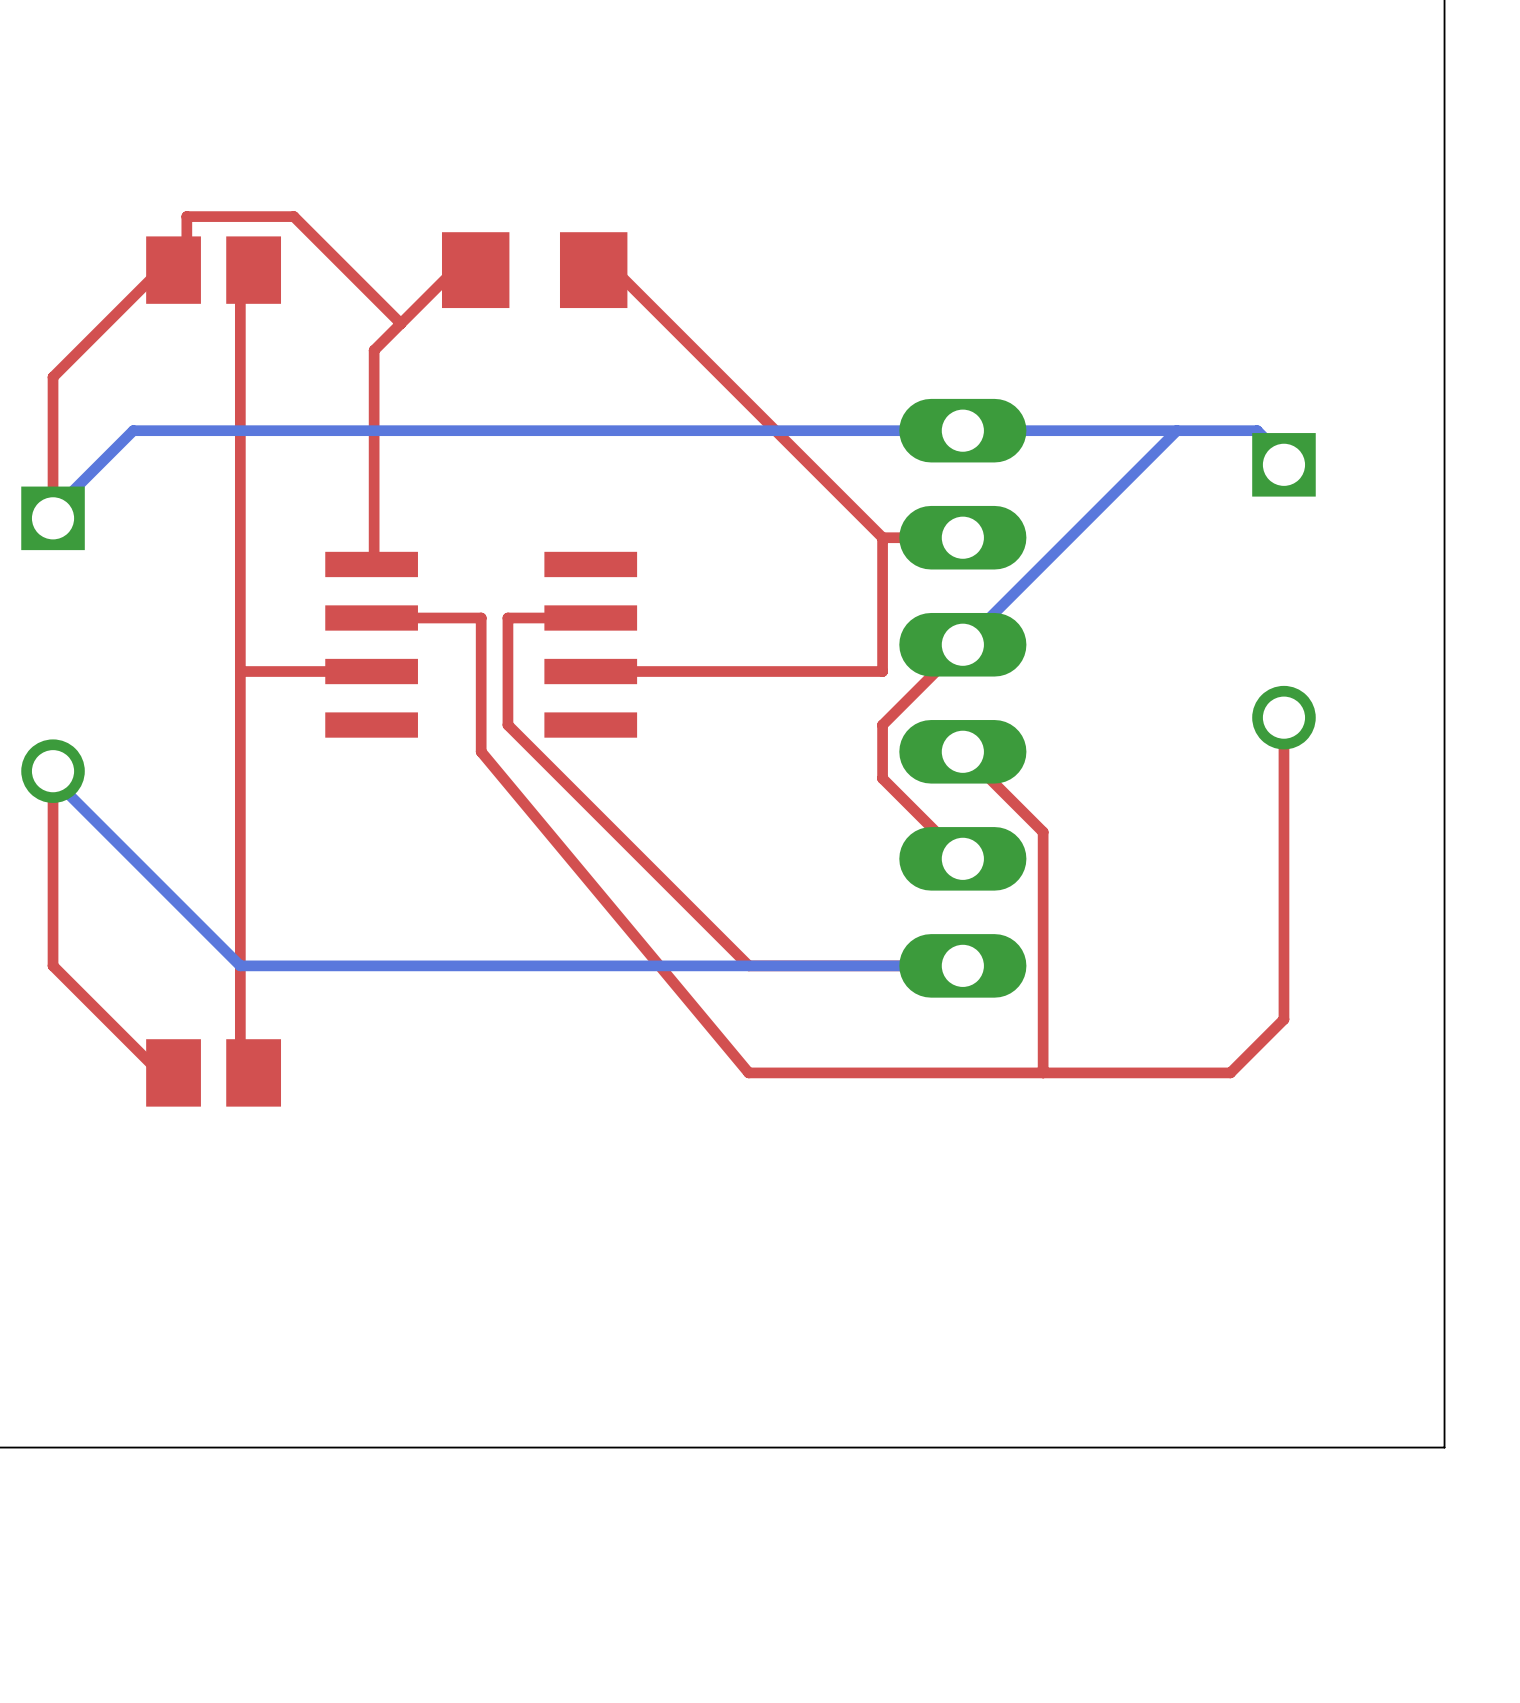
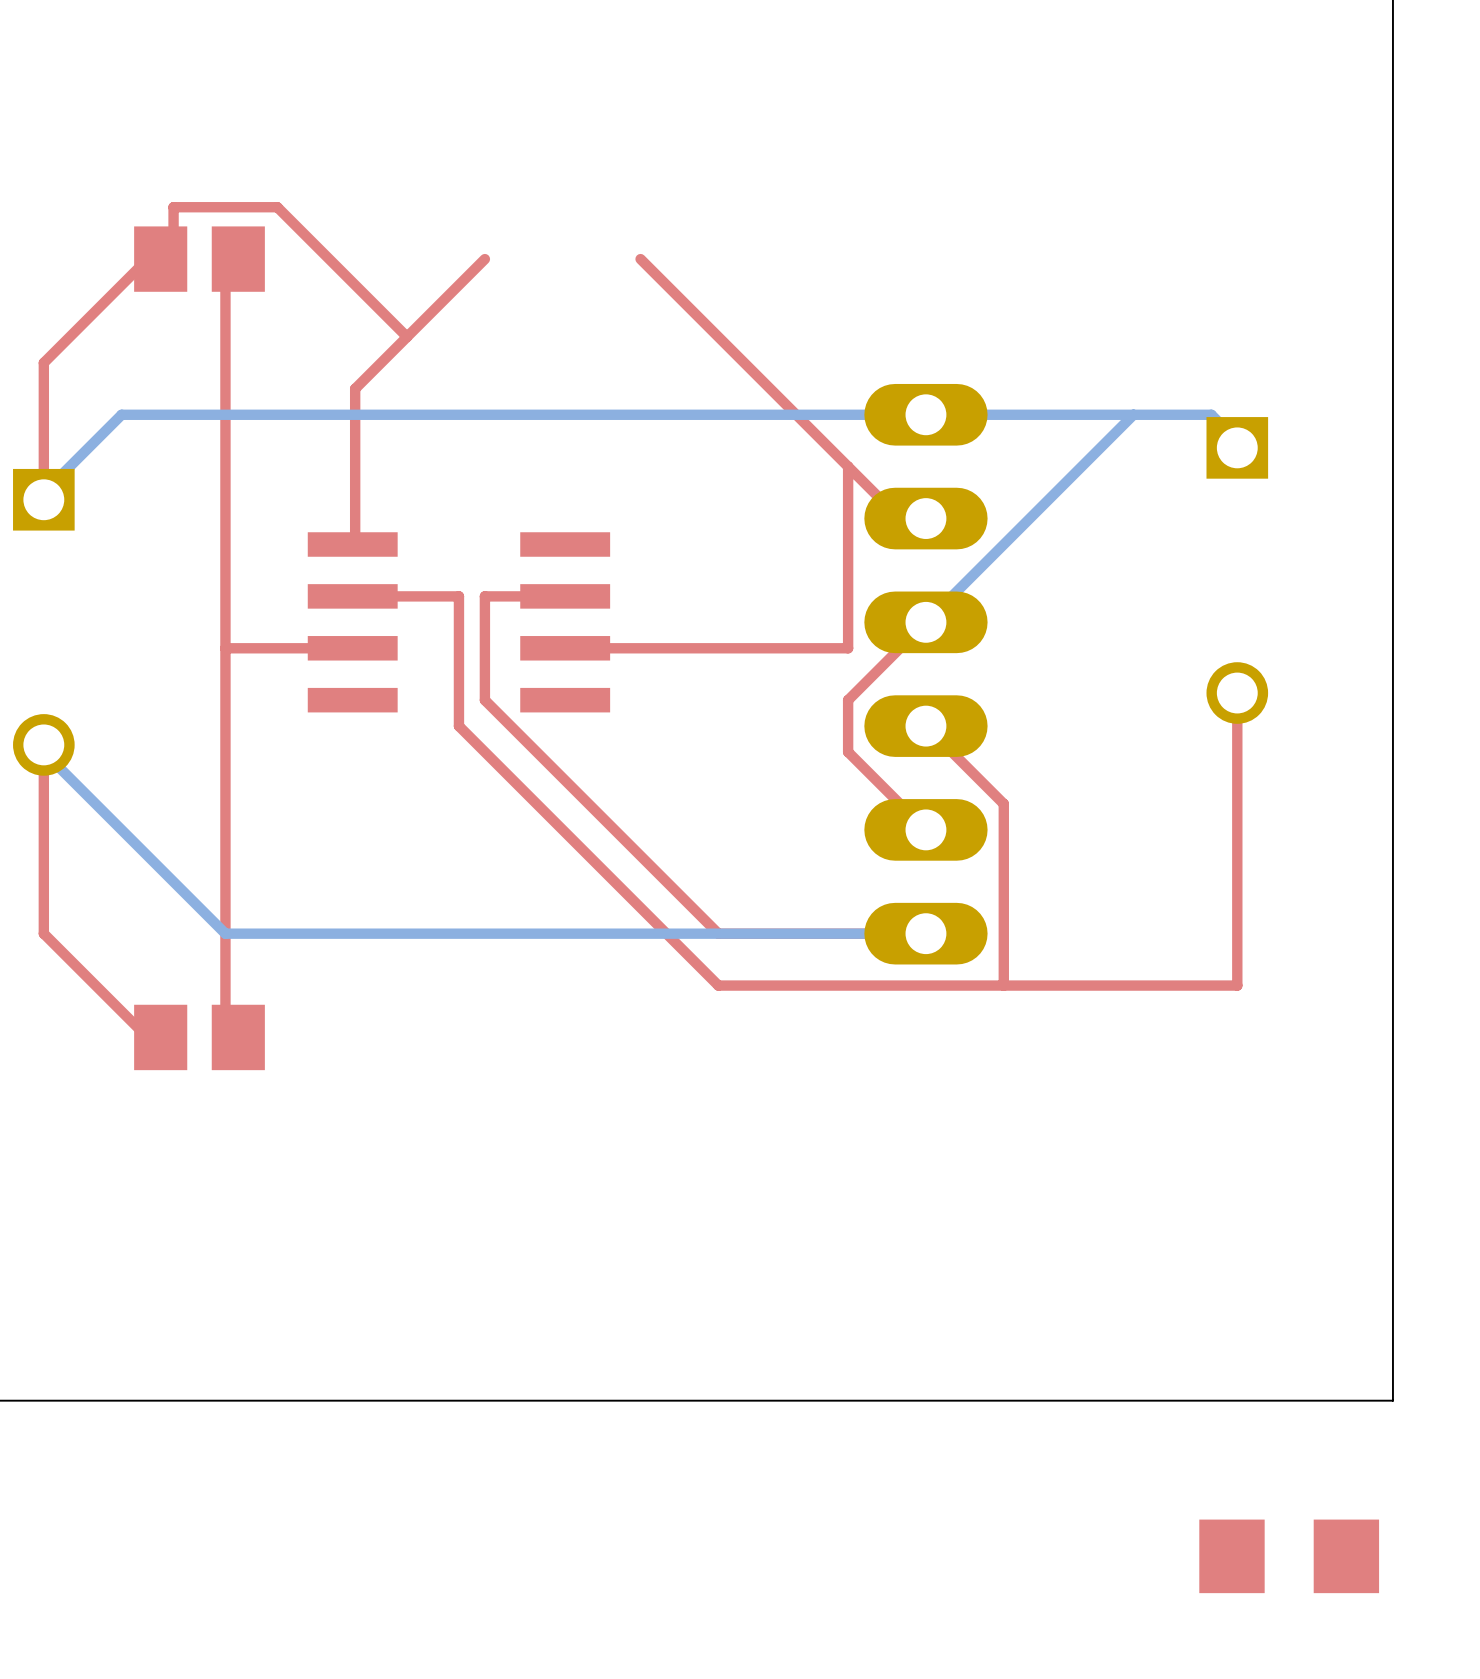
top track: (475, 270) (454, 270) (374, 350) (374, 403) -> (484, 259) (355, 388)
part: (534, 270) -> none
top track: (593, 270) (614, 270) (882, 537) (936, 537) -> (640, 259) (900, 518)
top track: none -> (381, 310) (407, 336)
top track: (481, 751) (748, 1072) (1230, 1072) (1283, 1019) -> (458, 726) (718, 985) (1237, 985)
top track: (1043, 1019) (1043, 1072) -> (848, 466) (848, 518)
part: none -> (1289, 1556)

